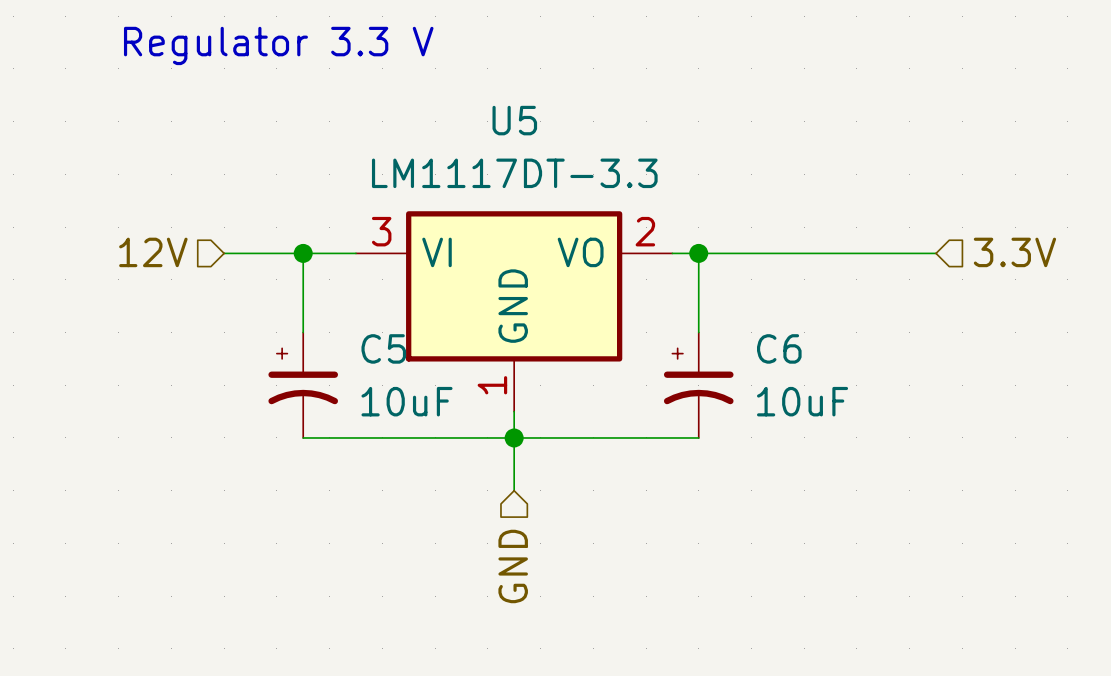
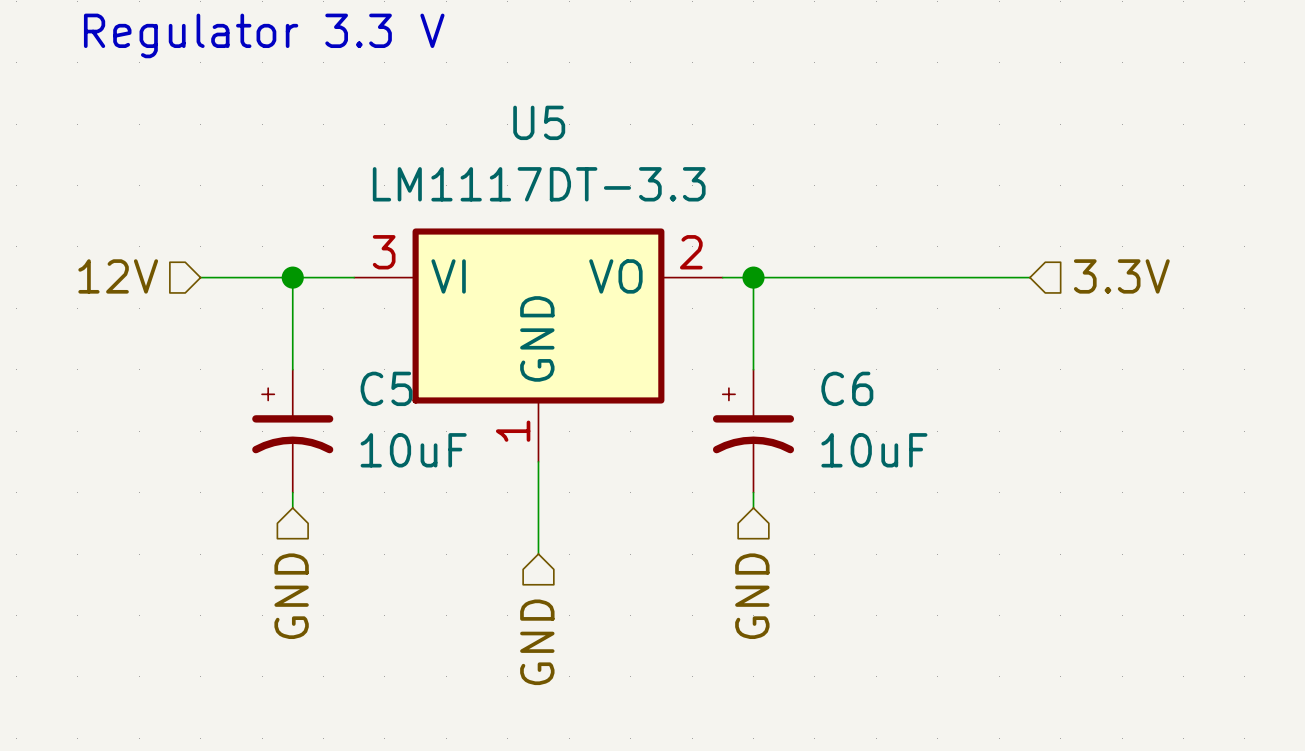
wire: (303, 437) (698, 437) -> (292, 492) (292, 507)
junction: (514, 437) -> none
wire: none -> (753, 492) (753, 507)
hierarchical label: none -> GND (291, 596)
hierarchical label: none -> GND (752, 596)

